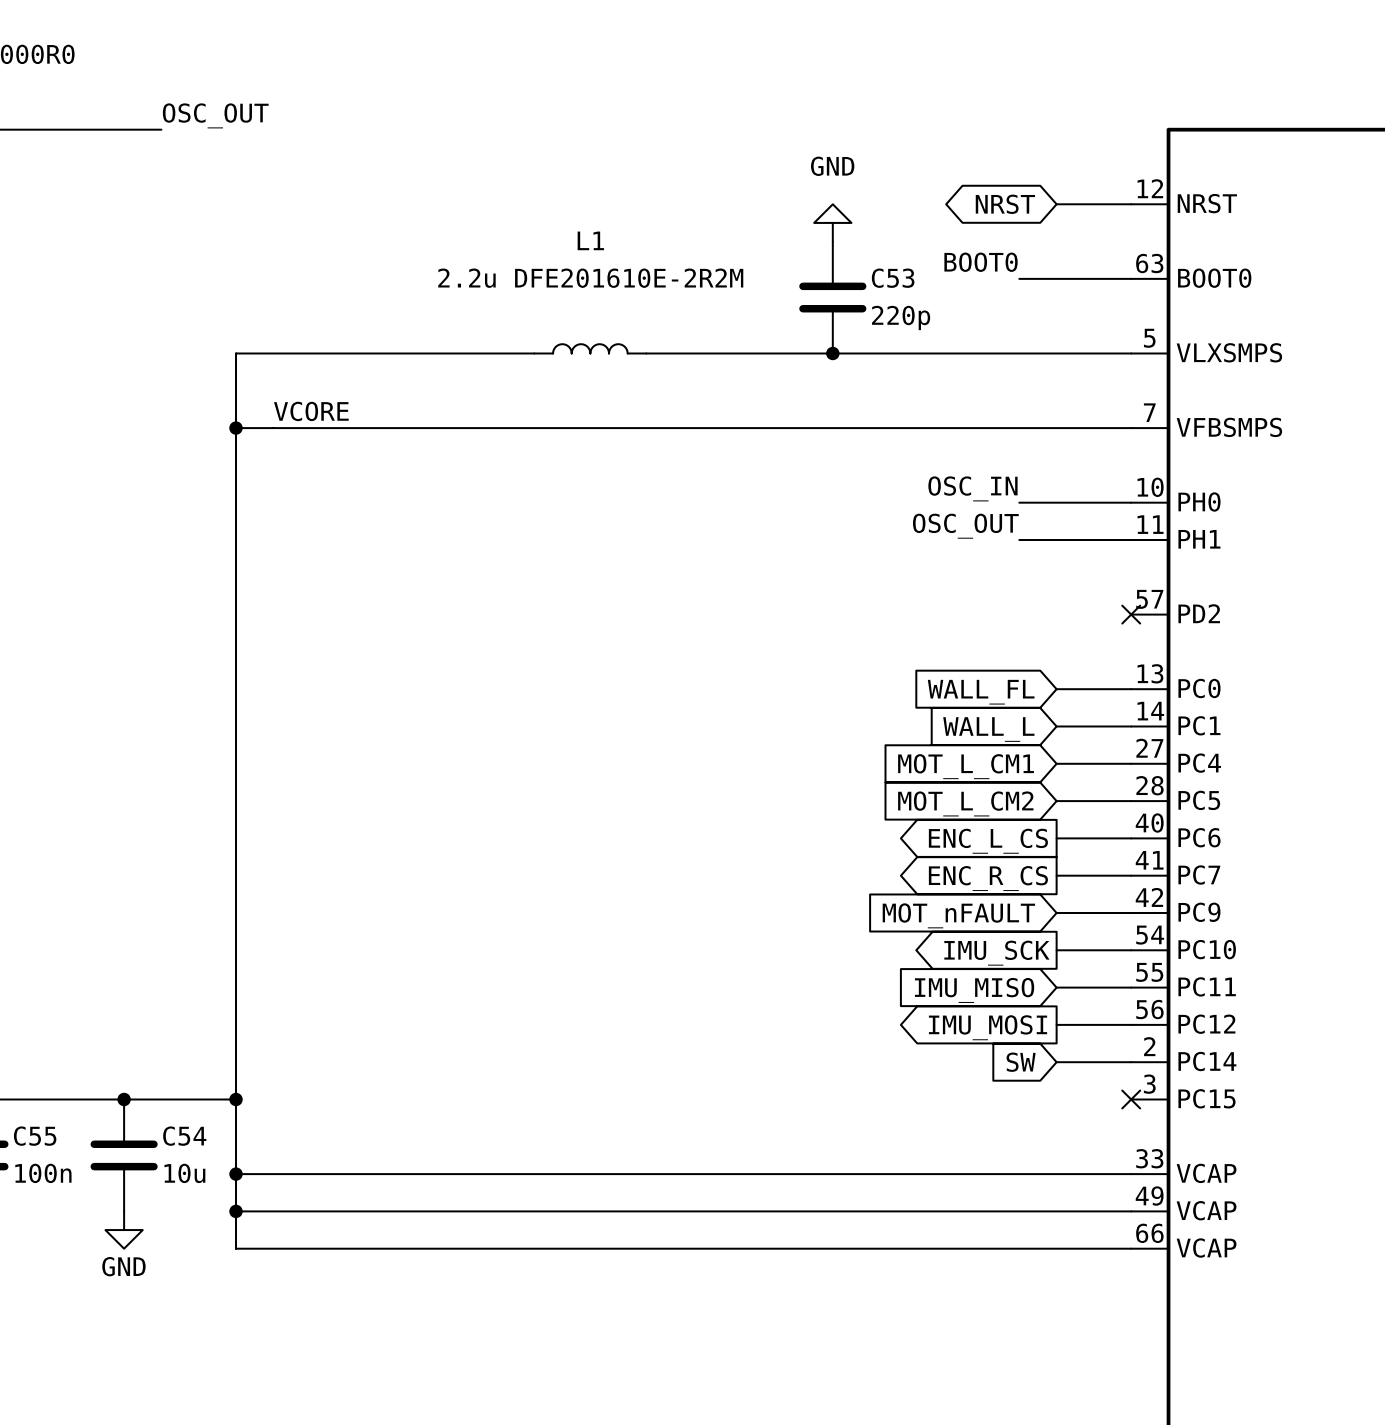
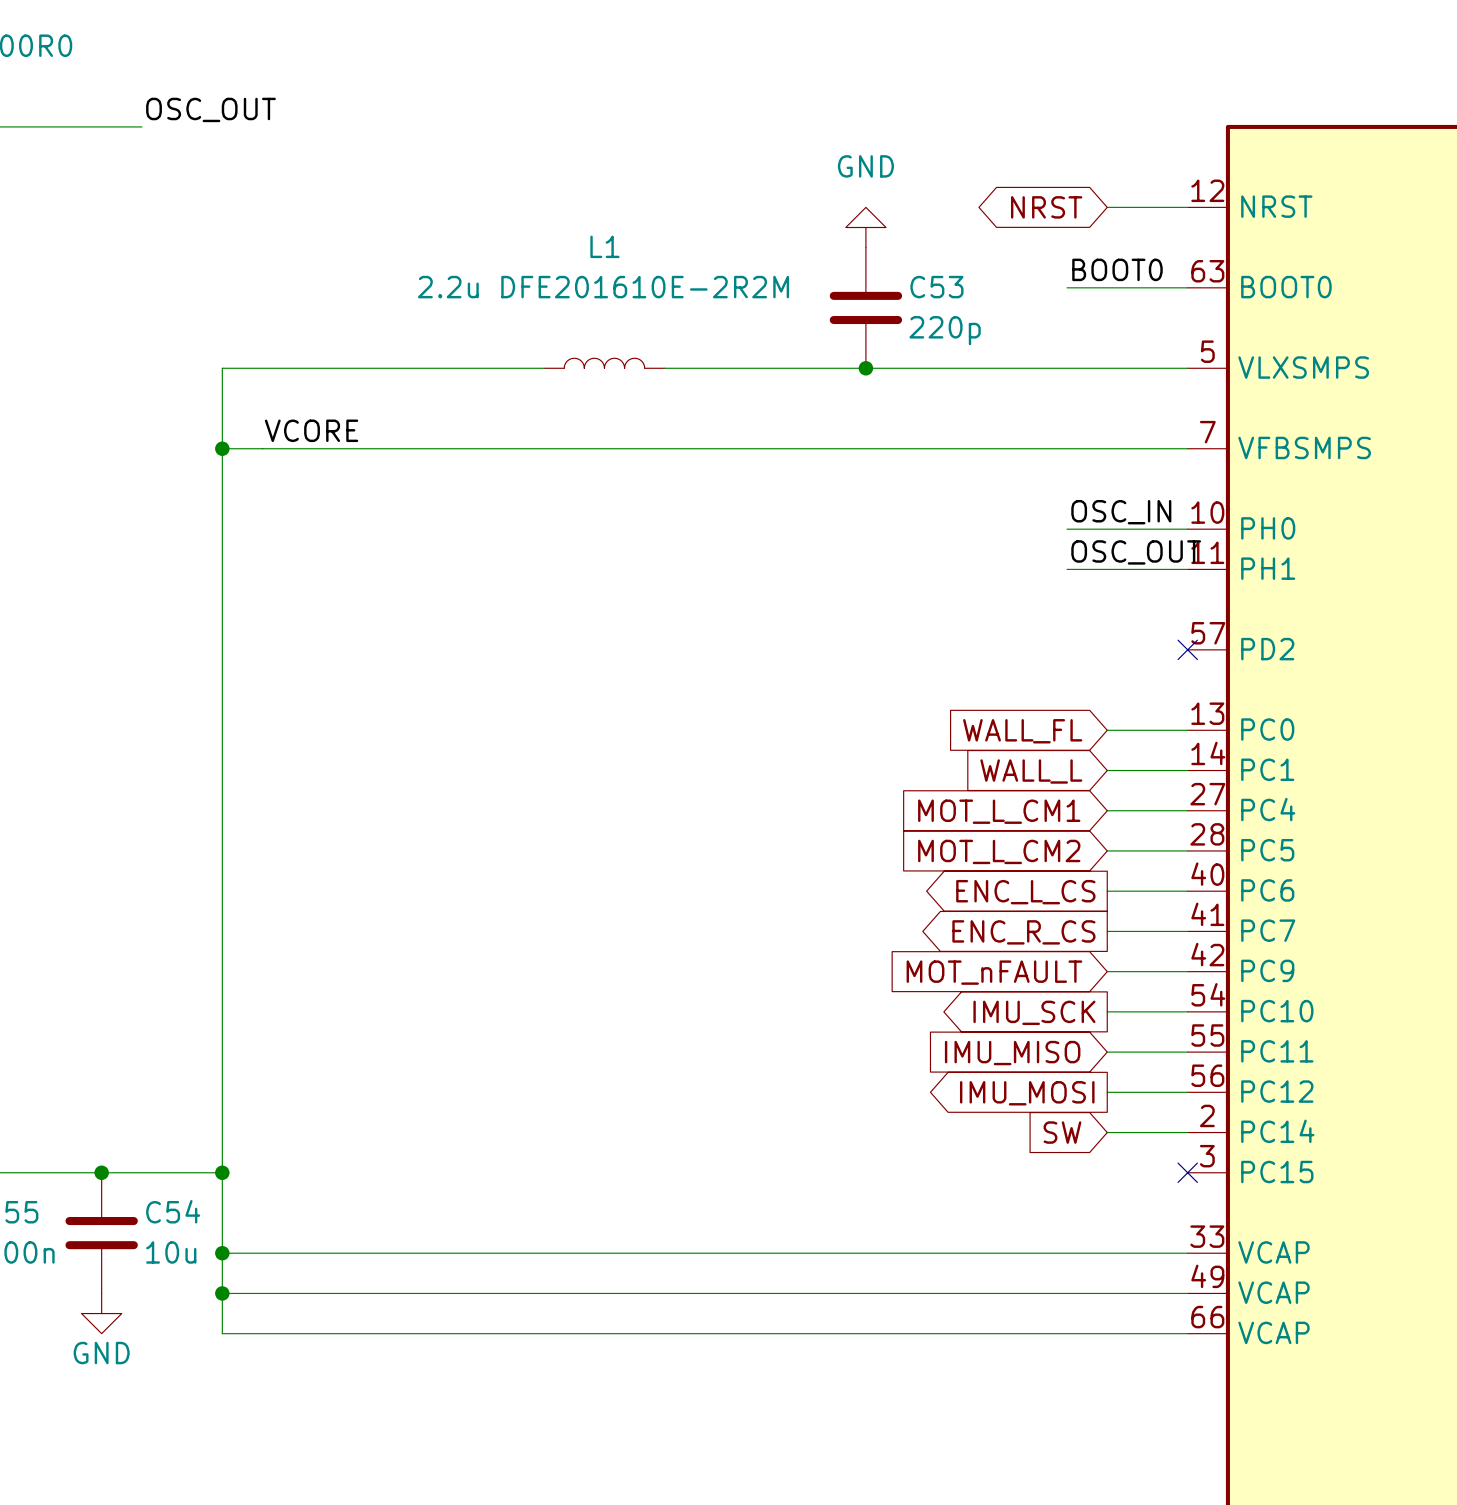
label position: BOOT0 (981, 262) -> BOOT0 (1117, 269)
label position: OSC_IN (972, 488) -> OSC_IN (1121, 512)
label position: OSC_OUT (965, 526) -> OSC_OUT (1136, 552)

